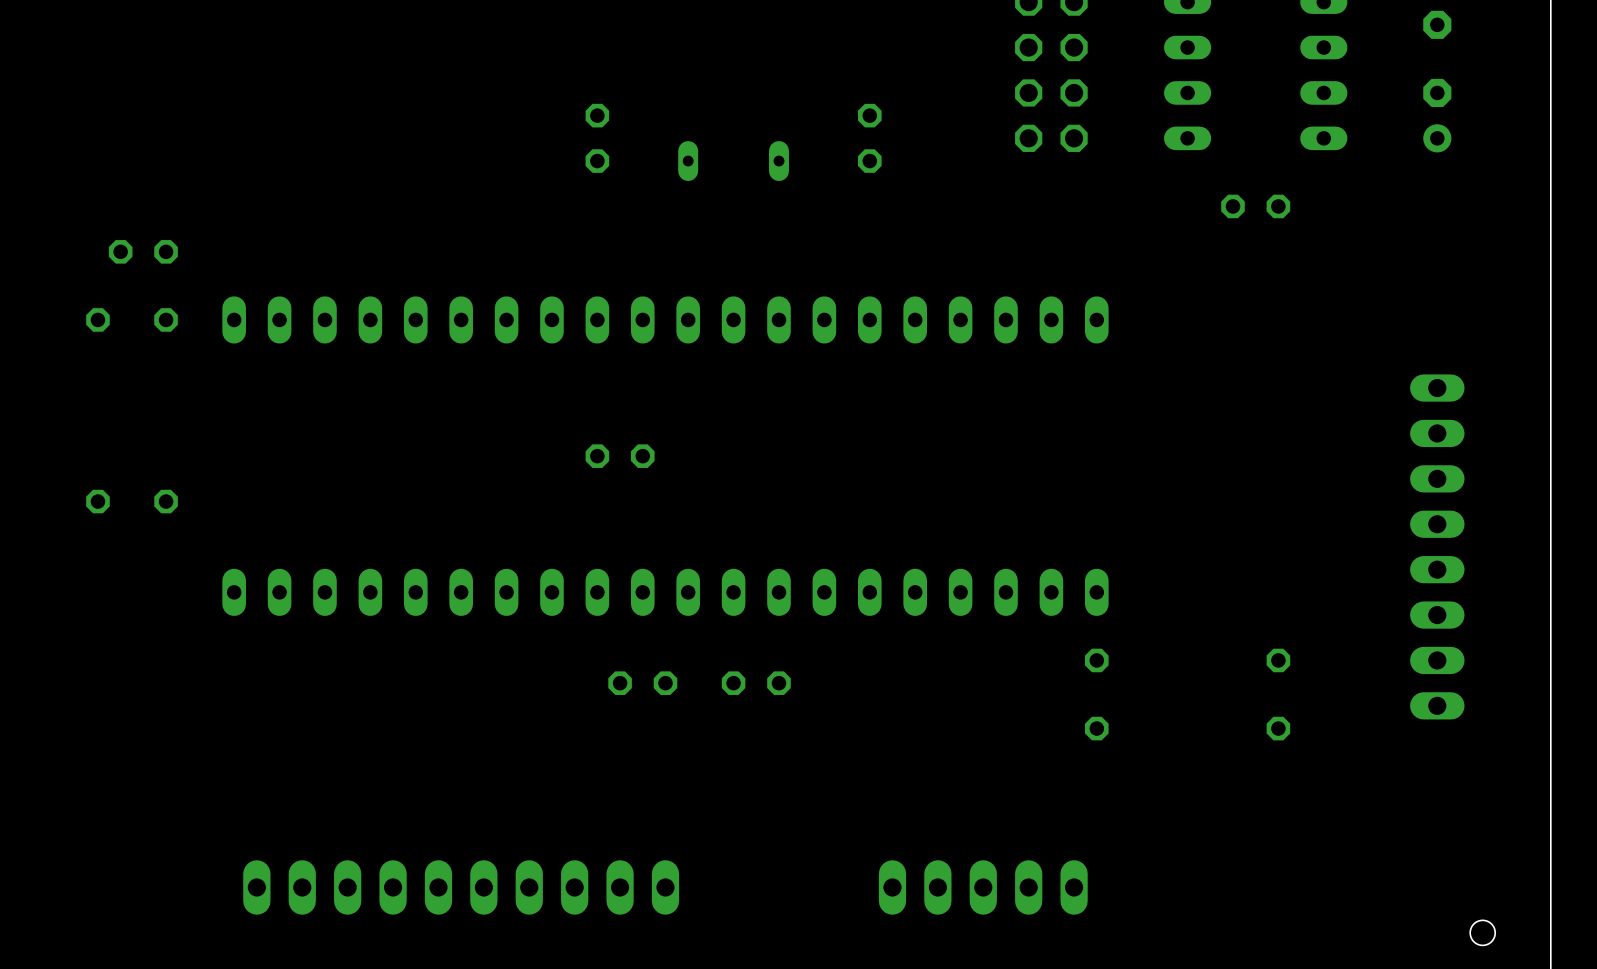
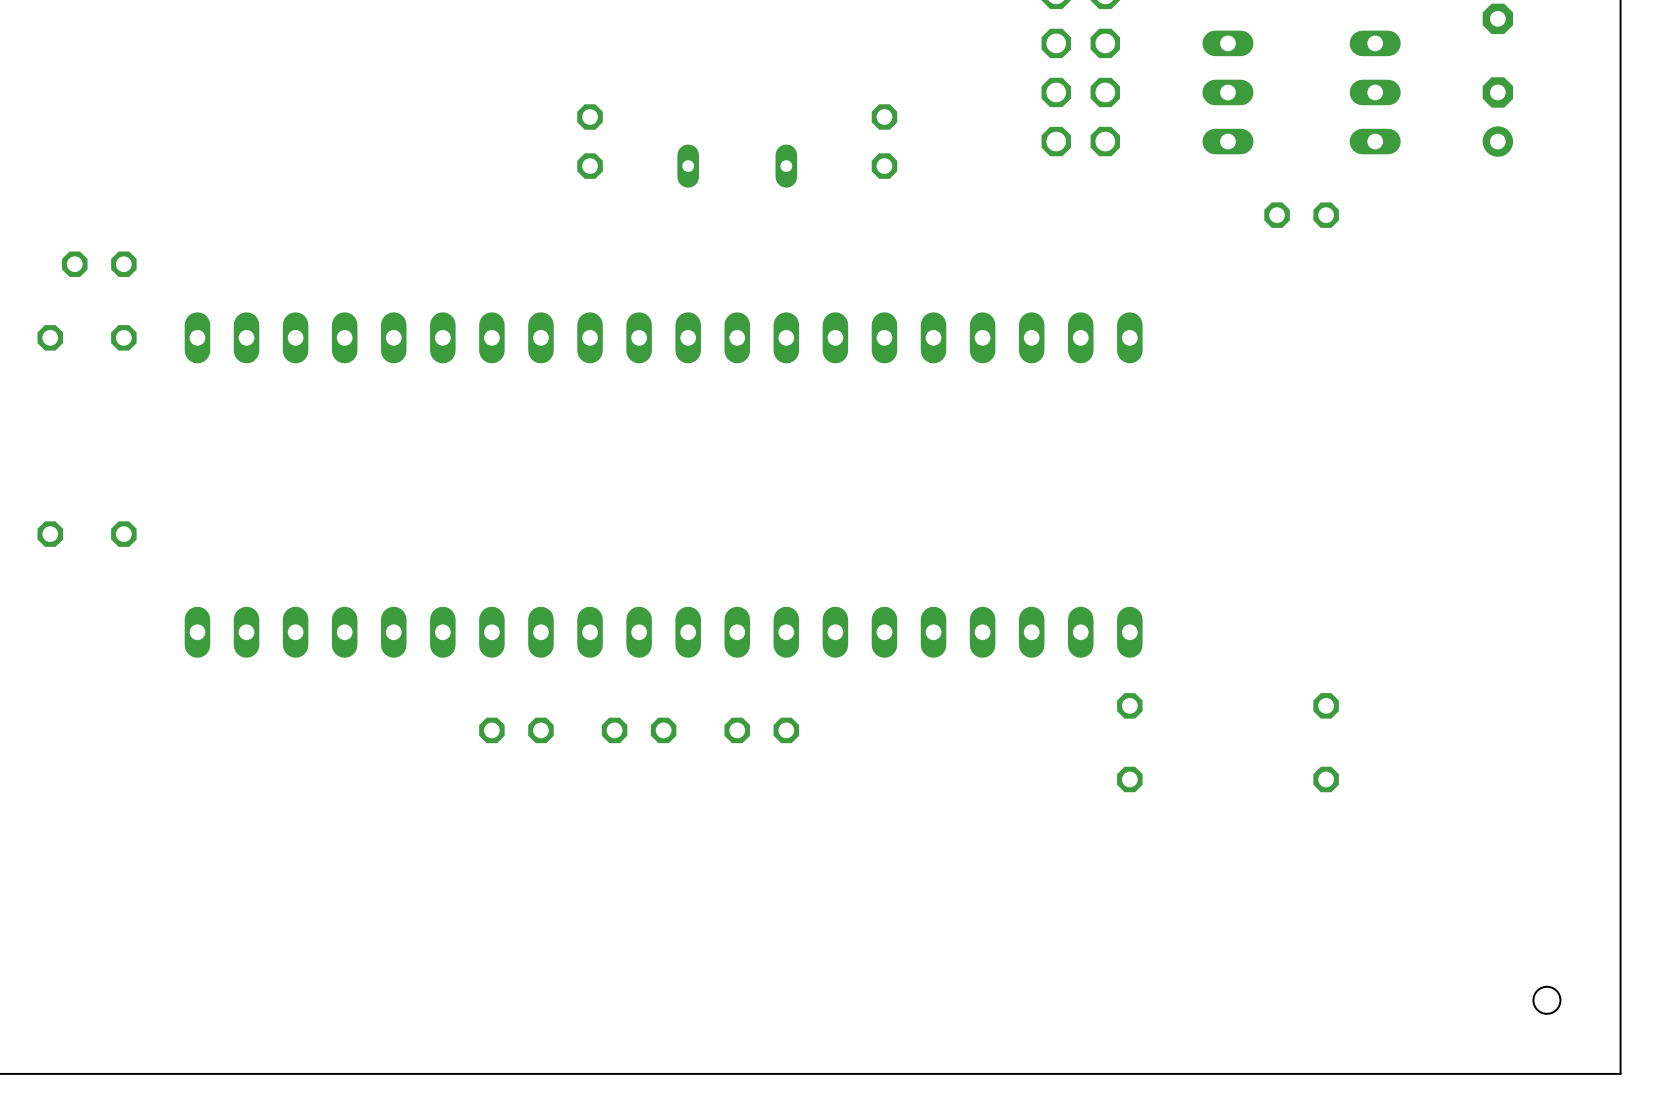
part position: (620, 456) -> (516, 730)
part: (1437, 546) -> none
part: (461, 887) -> none
part: (983, 887) -> none

